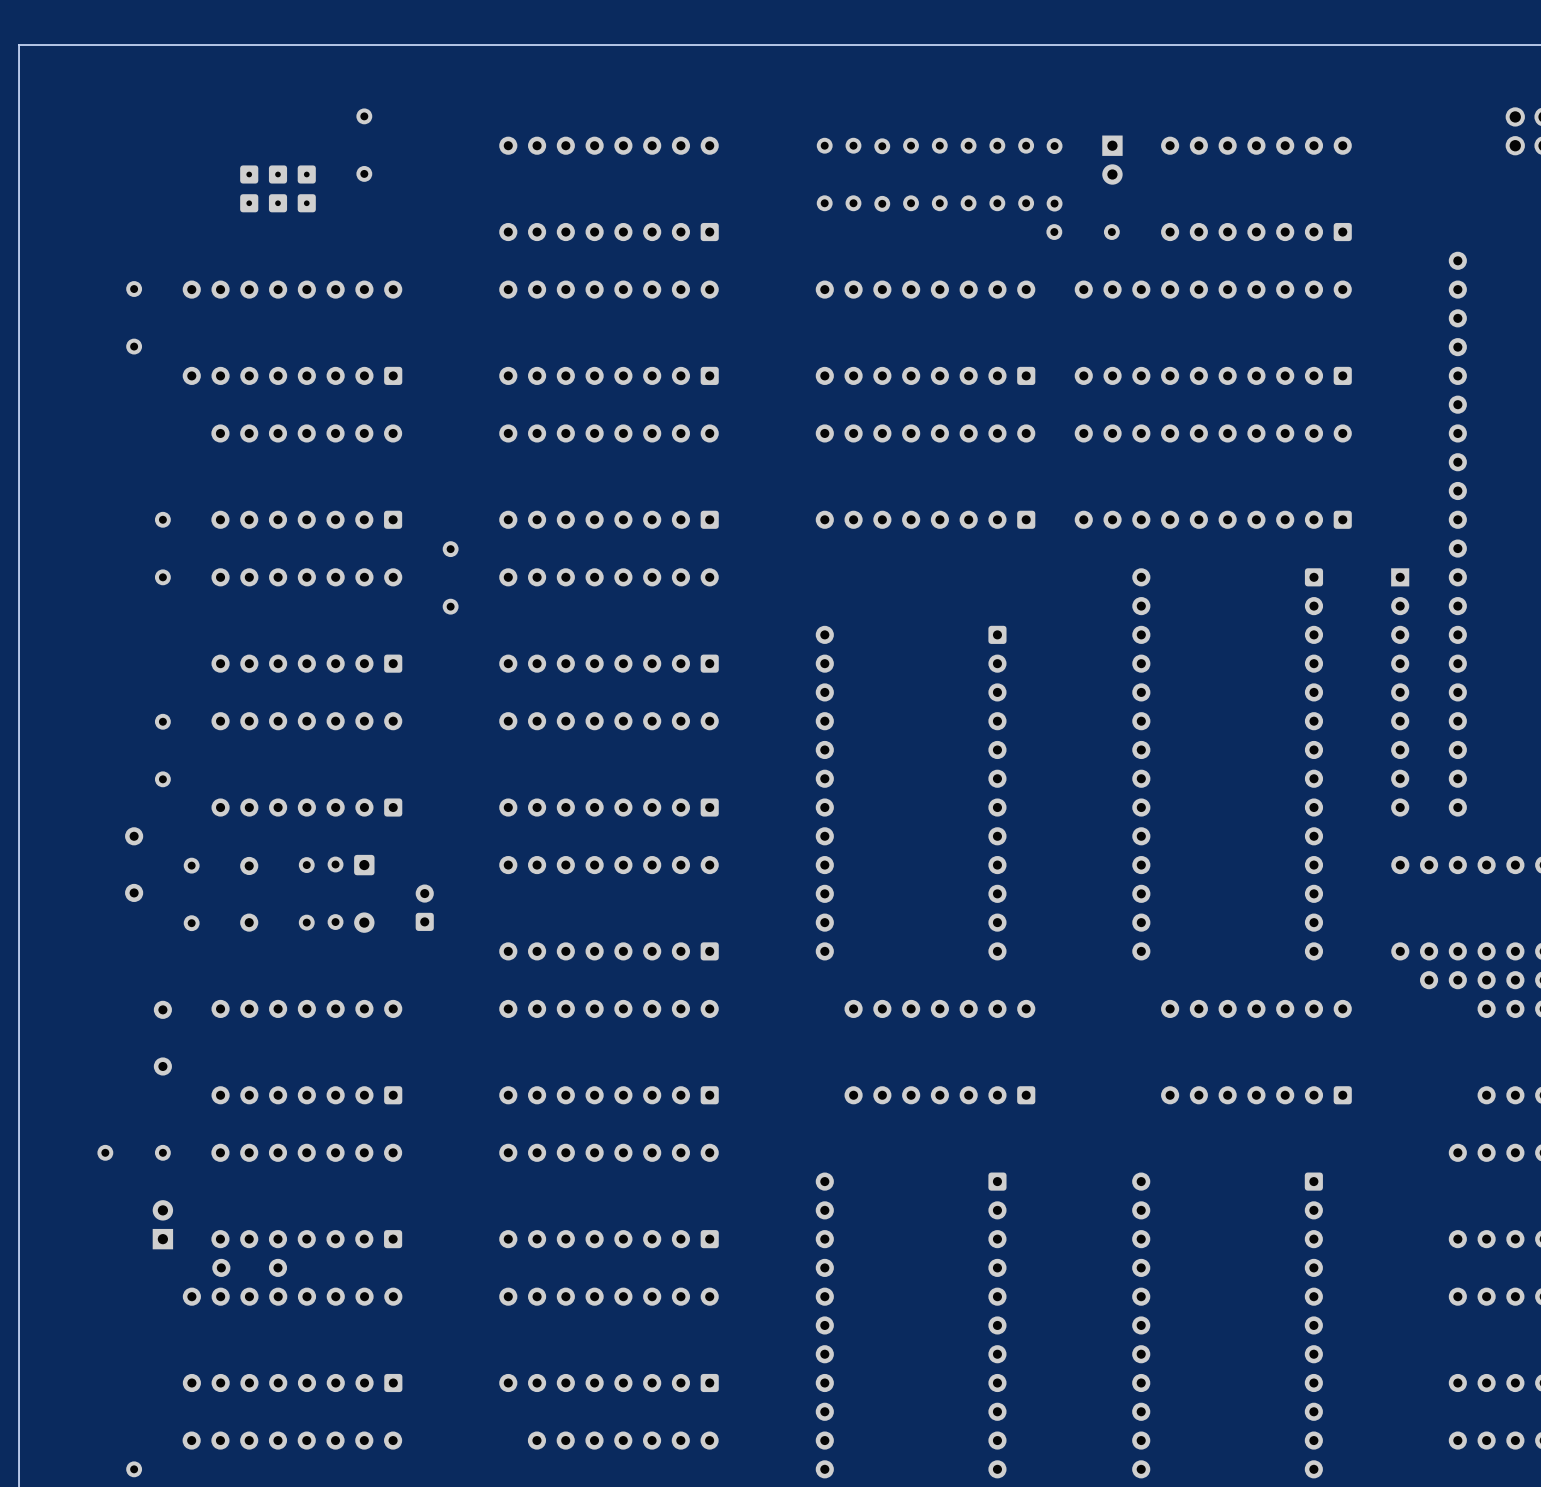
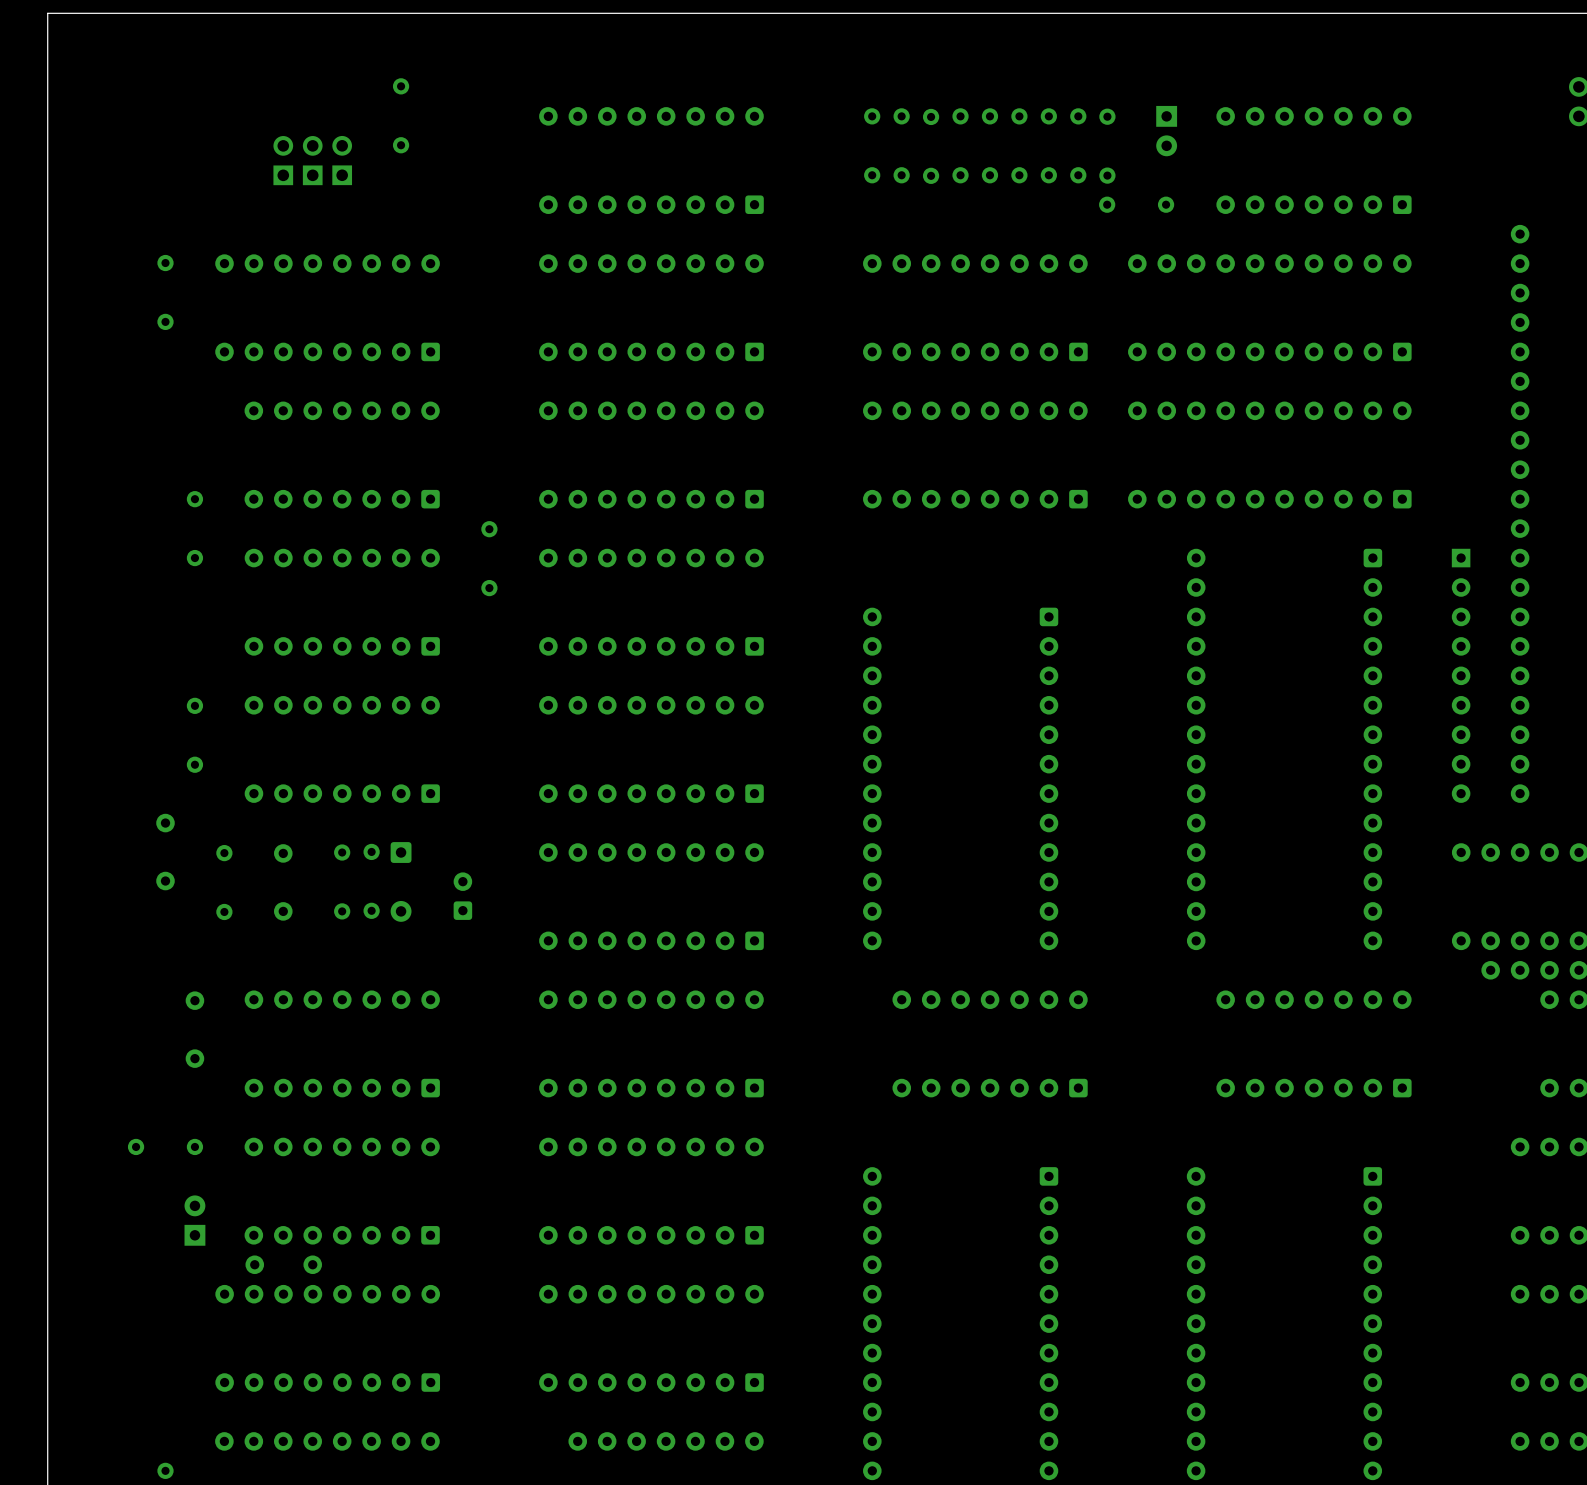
part footprint: [240, 165, 316, 213] -> [302, 136, 323, 186]
part: none -> (283, 160)
part: none -> (342, 160)

